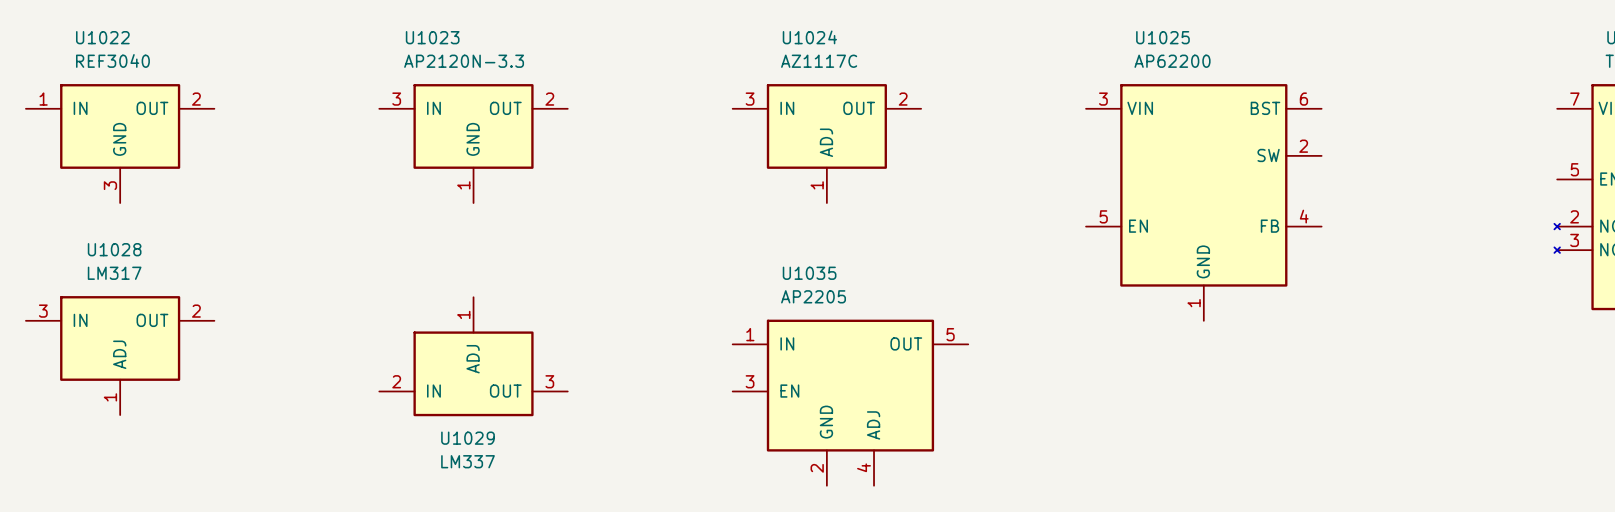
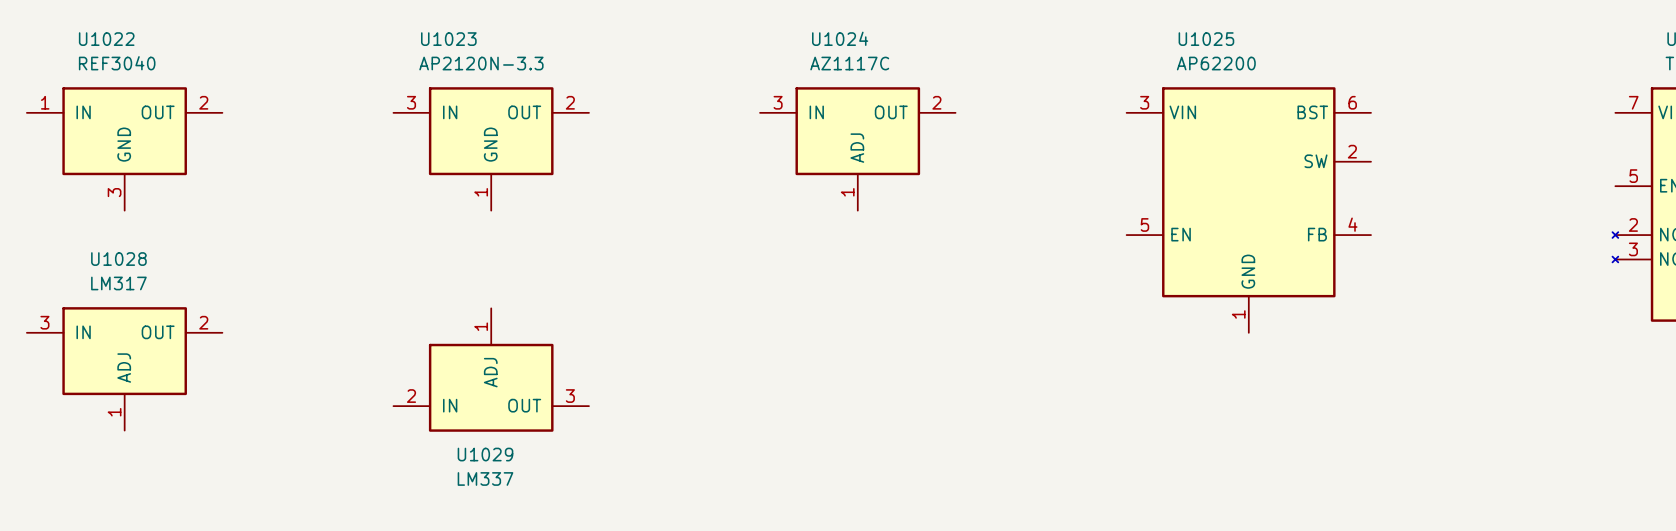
U1035: AP2205 (850, 402) -> none

